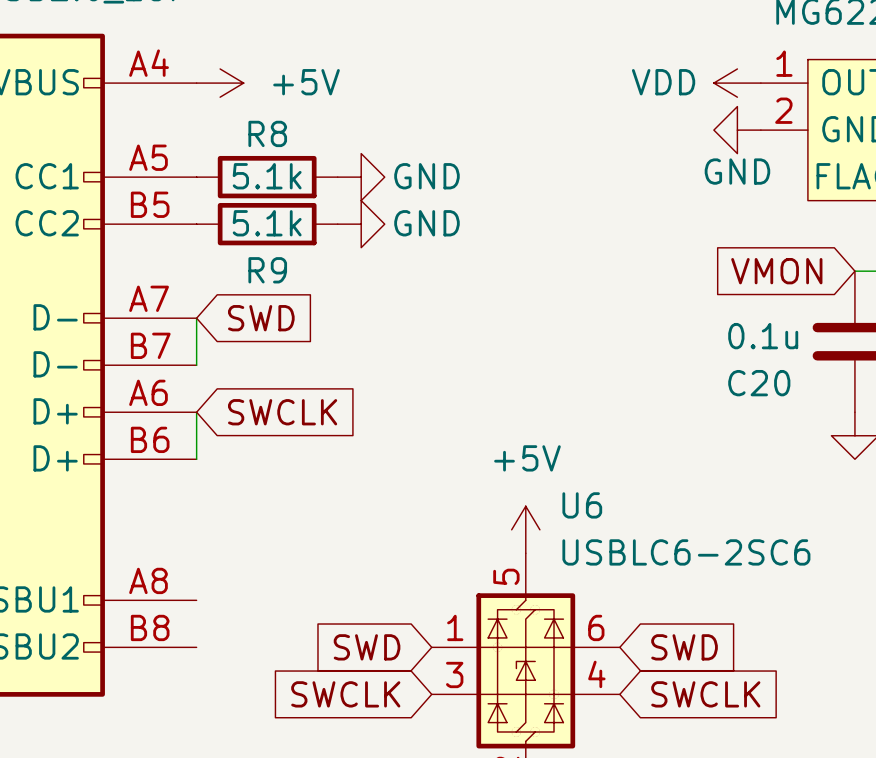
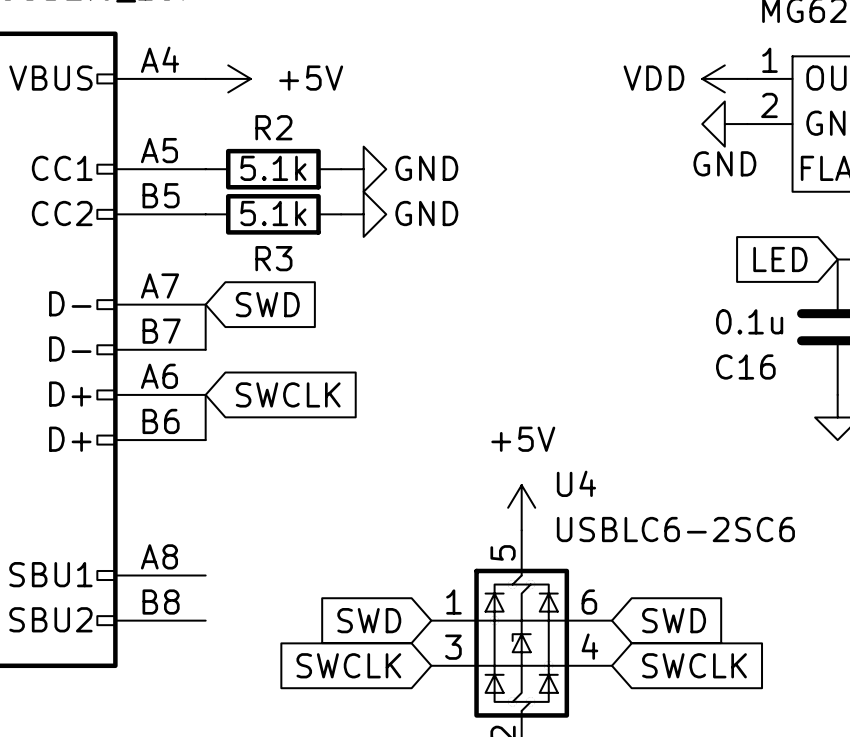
R8 name: R8 (267, 133) -> R2 (273, 127)
R9 name: R9 (267, 270) -> R3 (273, 258)
global label: VMON (776, 271) -> LED (780, 259)
C20 name: C20 (759, 383) -> C16 (745, 366)
U6 name: U6 (582, 505) -> U4 (576, 483)

